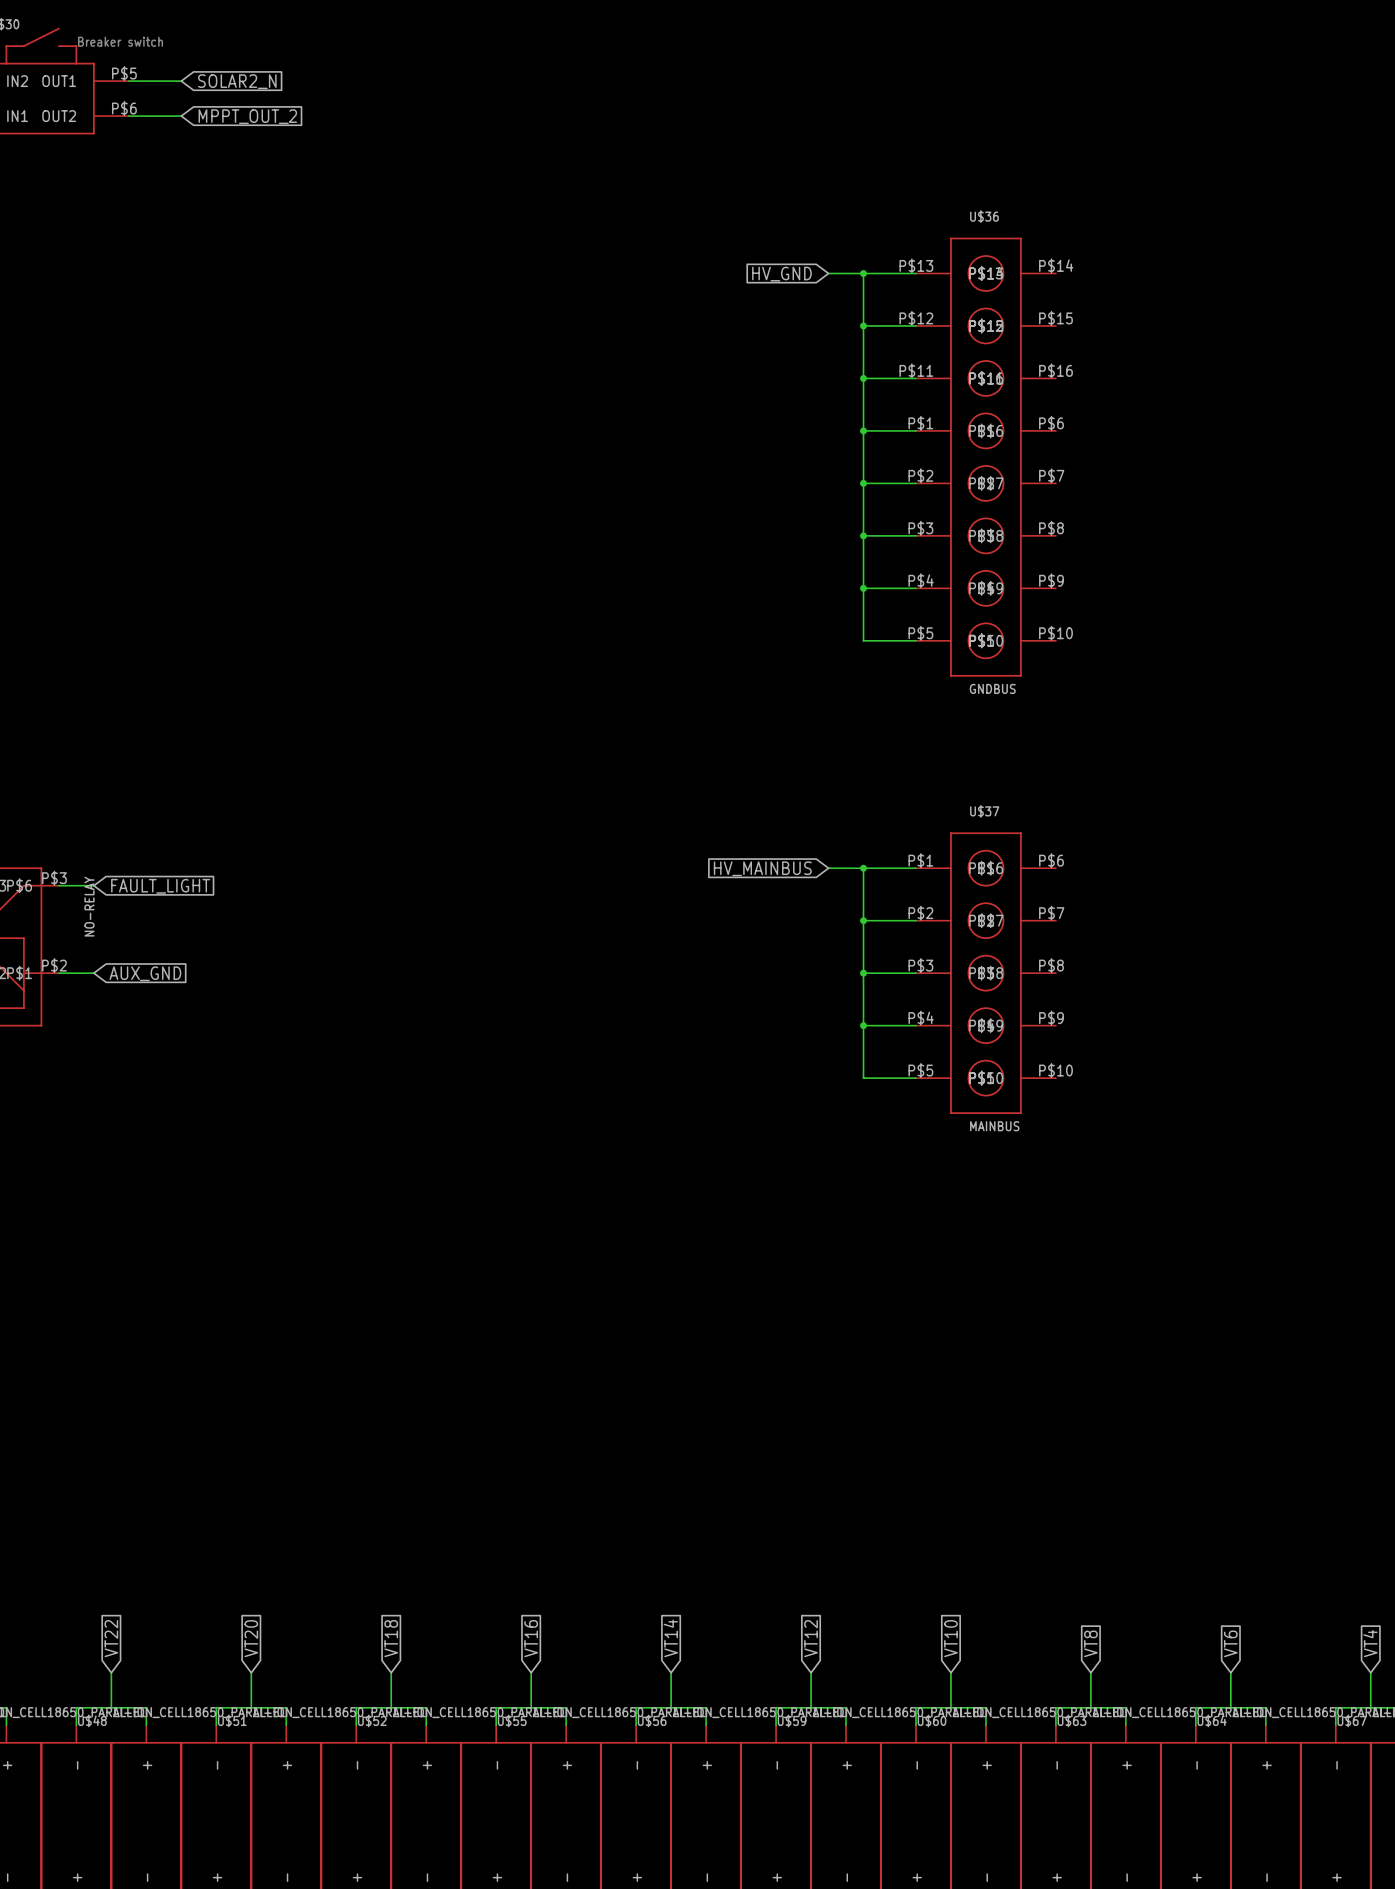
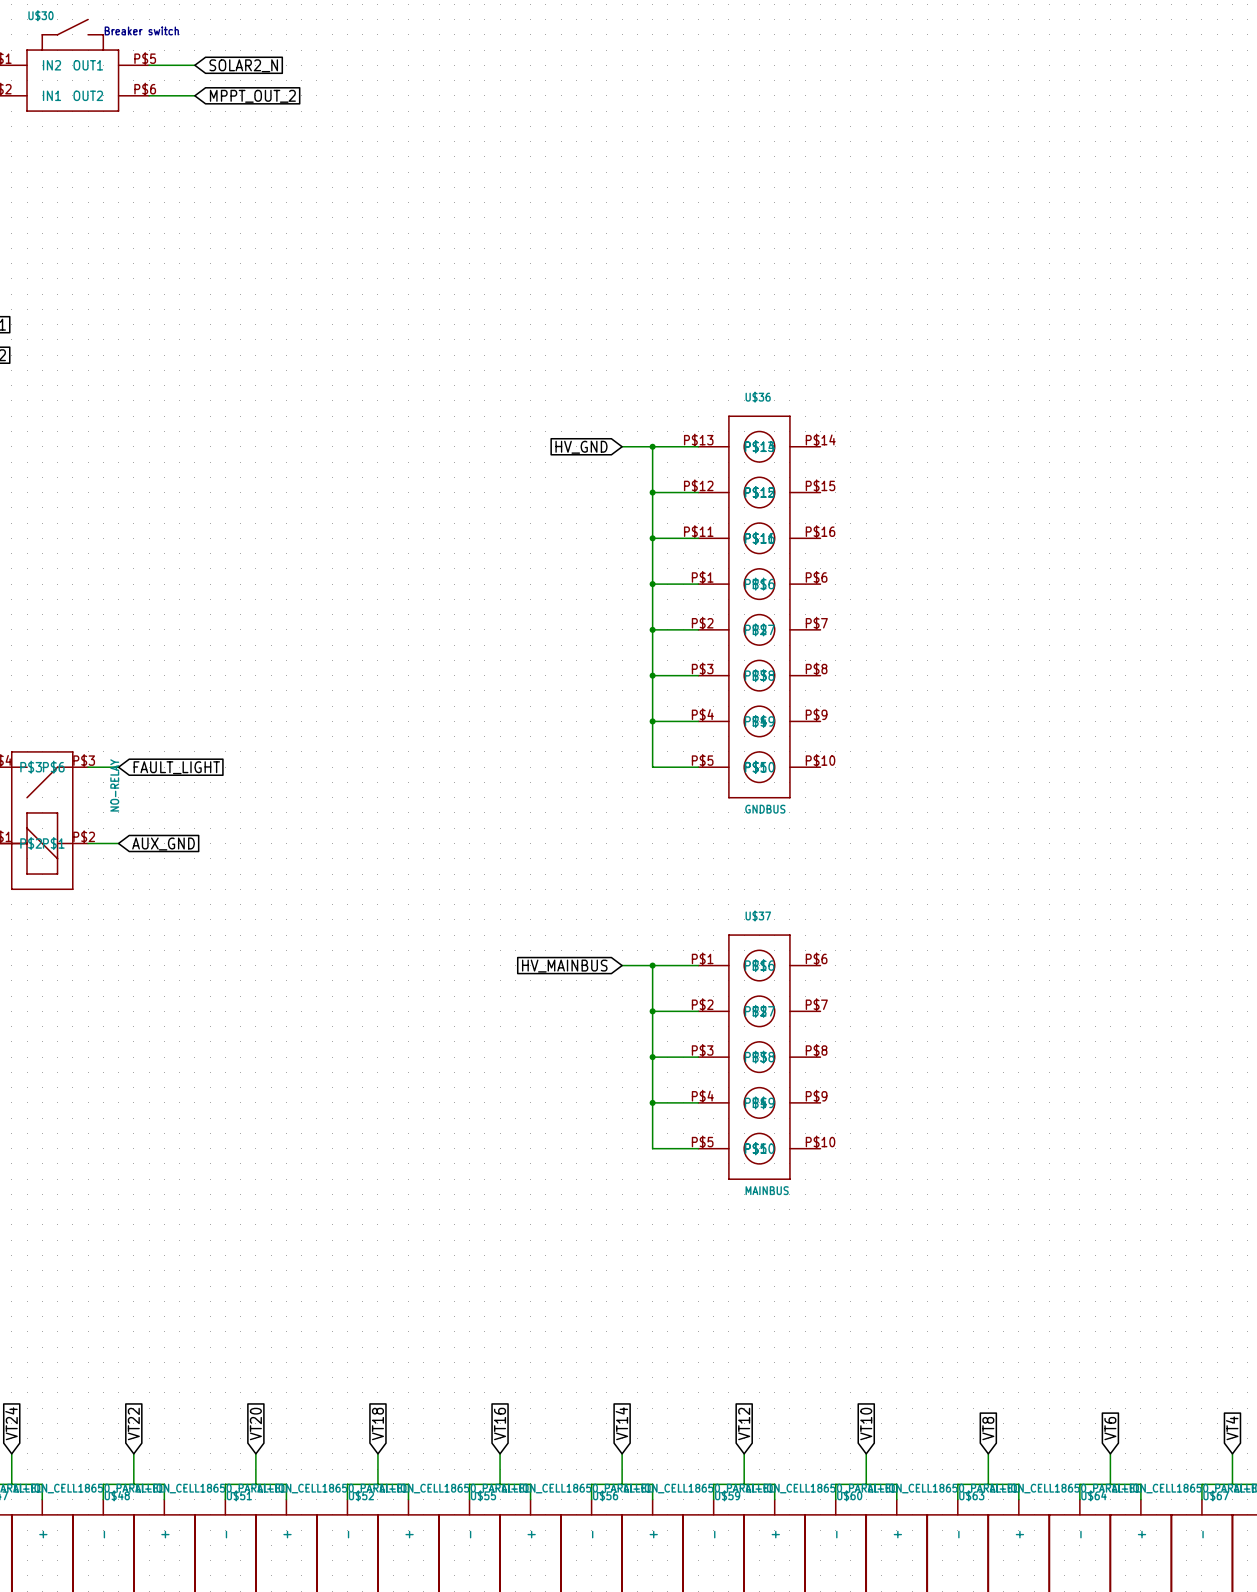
wire: (828, 273) (915, 273) -> none
wire: (863, 273) (863, 640) (915, 640) -> none
junction: (863, 273) -> none
global label: HV_GND (781, 274) -> none
wire: (863, 325) (915, 325) -> none
junction: (863, 325) -> none
wire: (863, 378) (915, 378) -> none
junction: (863, 378) -> none
wire: (863, 430) (915, 430) -> none
junction: (863, 430) -> none
U$36 position: (985, 457) -> (759, 606)
wire: (863, 483) (915, 483) -> none
junction: (863, 483) -> none
global label: none -> HV_GND (581, 447)
wire: none -> (622, 446) (698, 446)
wire: none -> (652, 446) (652, 767) (698, 767)
junction: none -> (652, 446)
wire: (863, 535) (915, 535) -> (652, 492) (698, 492)
junction: (863, 535) -> none
junction: none -> (652, 492)
wire: (863, 588) (915, 588) -> (652, 538) (698, 538)
junction: (863, 588) -> none
junction: none -> (652, 538)
wire: none -> (652, 584) (698, 584)
junction: none -> (652, 584)
wire: none -> (652, 629) (698, 629)
junction: none -> (652, 629)
wire: none -> (652, 675) (698, 675)
junction: none -> (652, 675)
wire: none -> (652, 721) (698, 721)
junction: none -> (652, 721)
global label: HV_MAINBUS (762, 868) -> none
wire: (828, 868) (915, 868) -> none
wire: (863, 868) (863, 1078) (915, 1078) -> none
junction: (863, 868) -> none
wire: (863, 920) (915, 920) -> none
junction: (863, 920) -> none
wire: (863, 973) (915, 973) -> none
junction: (863, 973) -> none
U$37 position: (985, 973) -> (759, 1057)
wire: (863, 1025) (915, 1025) -> none
junction: (863, 1025) -> none
global label: none -> HV_MAINBUS (564, 966)
wire: none -> (622, 965) (698, 965)
wire: none -> (652, 965) (652, 1148) (698, 1148)
junction: none -> (652, 965)
wire: none -> (652, 1011) (698, 1011)
junction: none -> (652, 1011)
wire: none -> (652, 1057) (698, 1057)
junction: none -> (652, 1057)
wire: none -> (652, 1102) (698, 1102)
junction: none -> (652, 1102)

